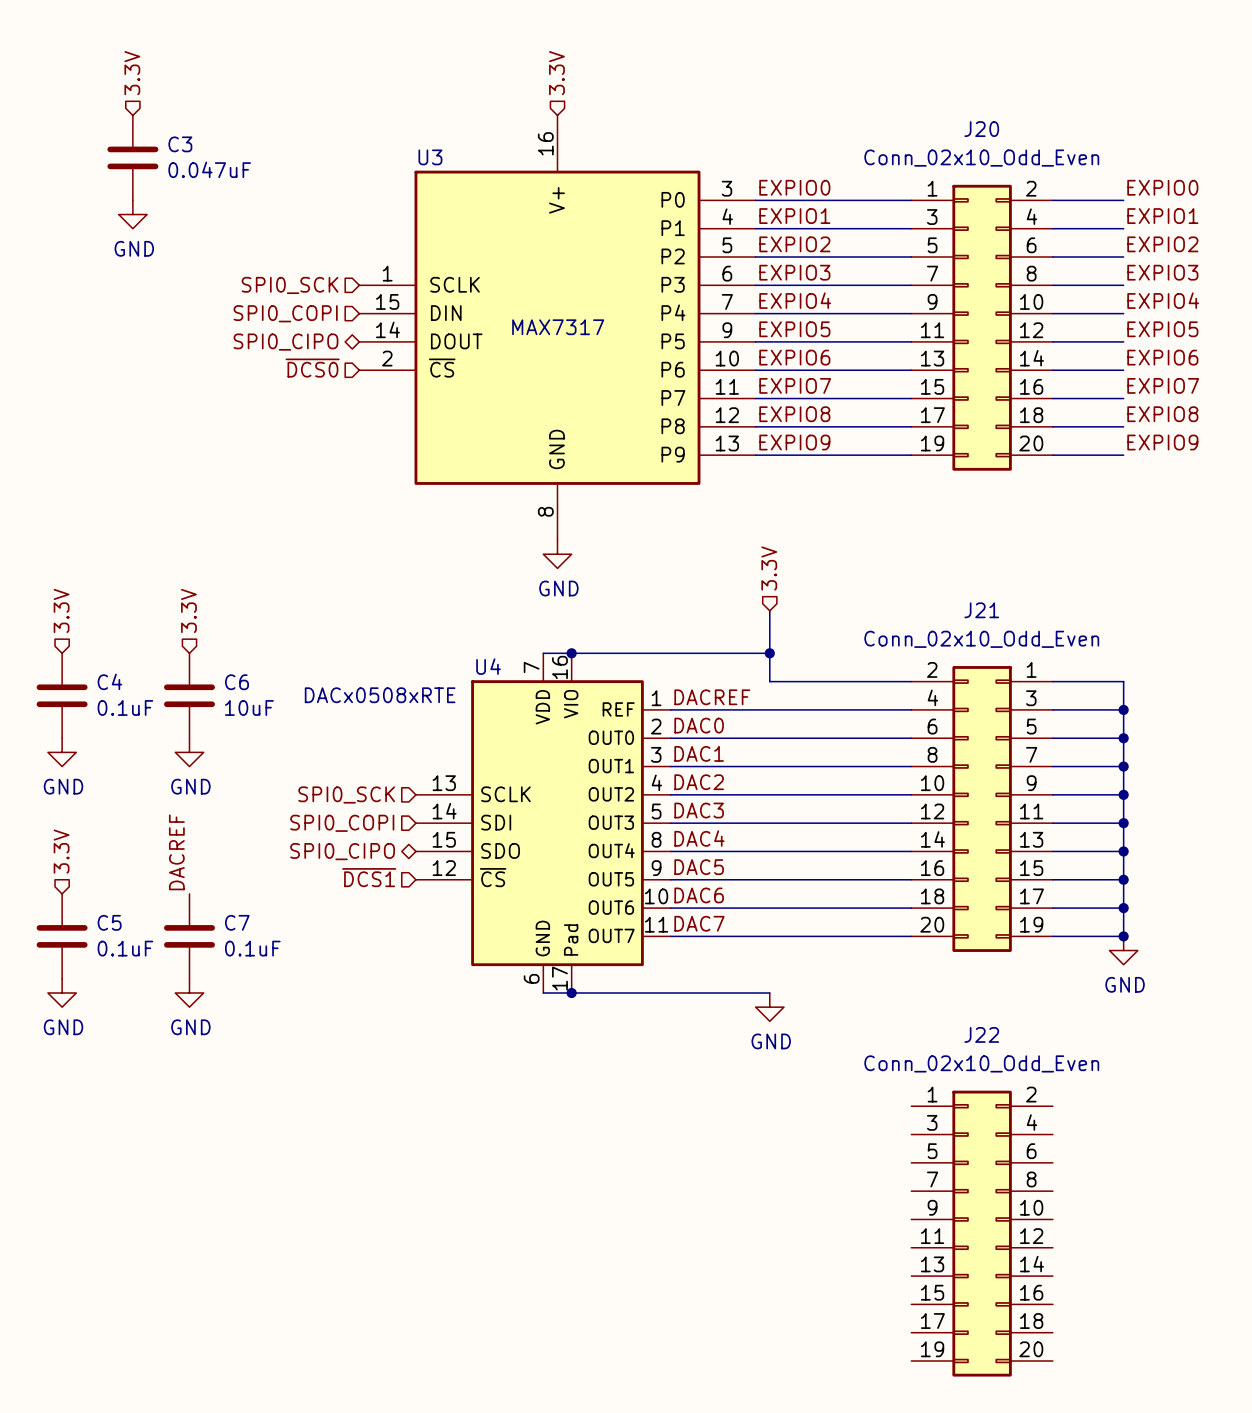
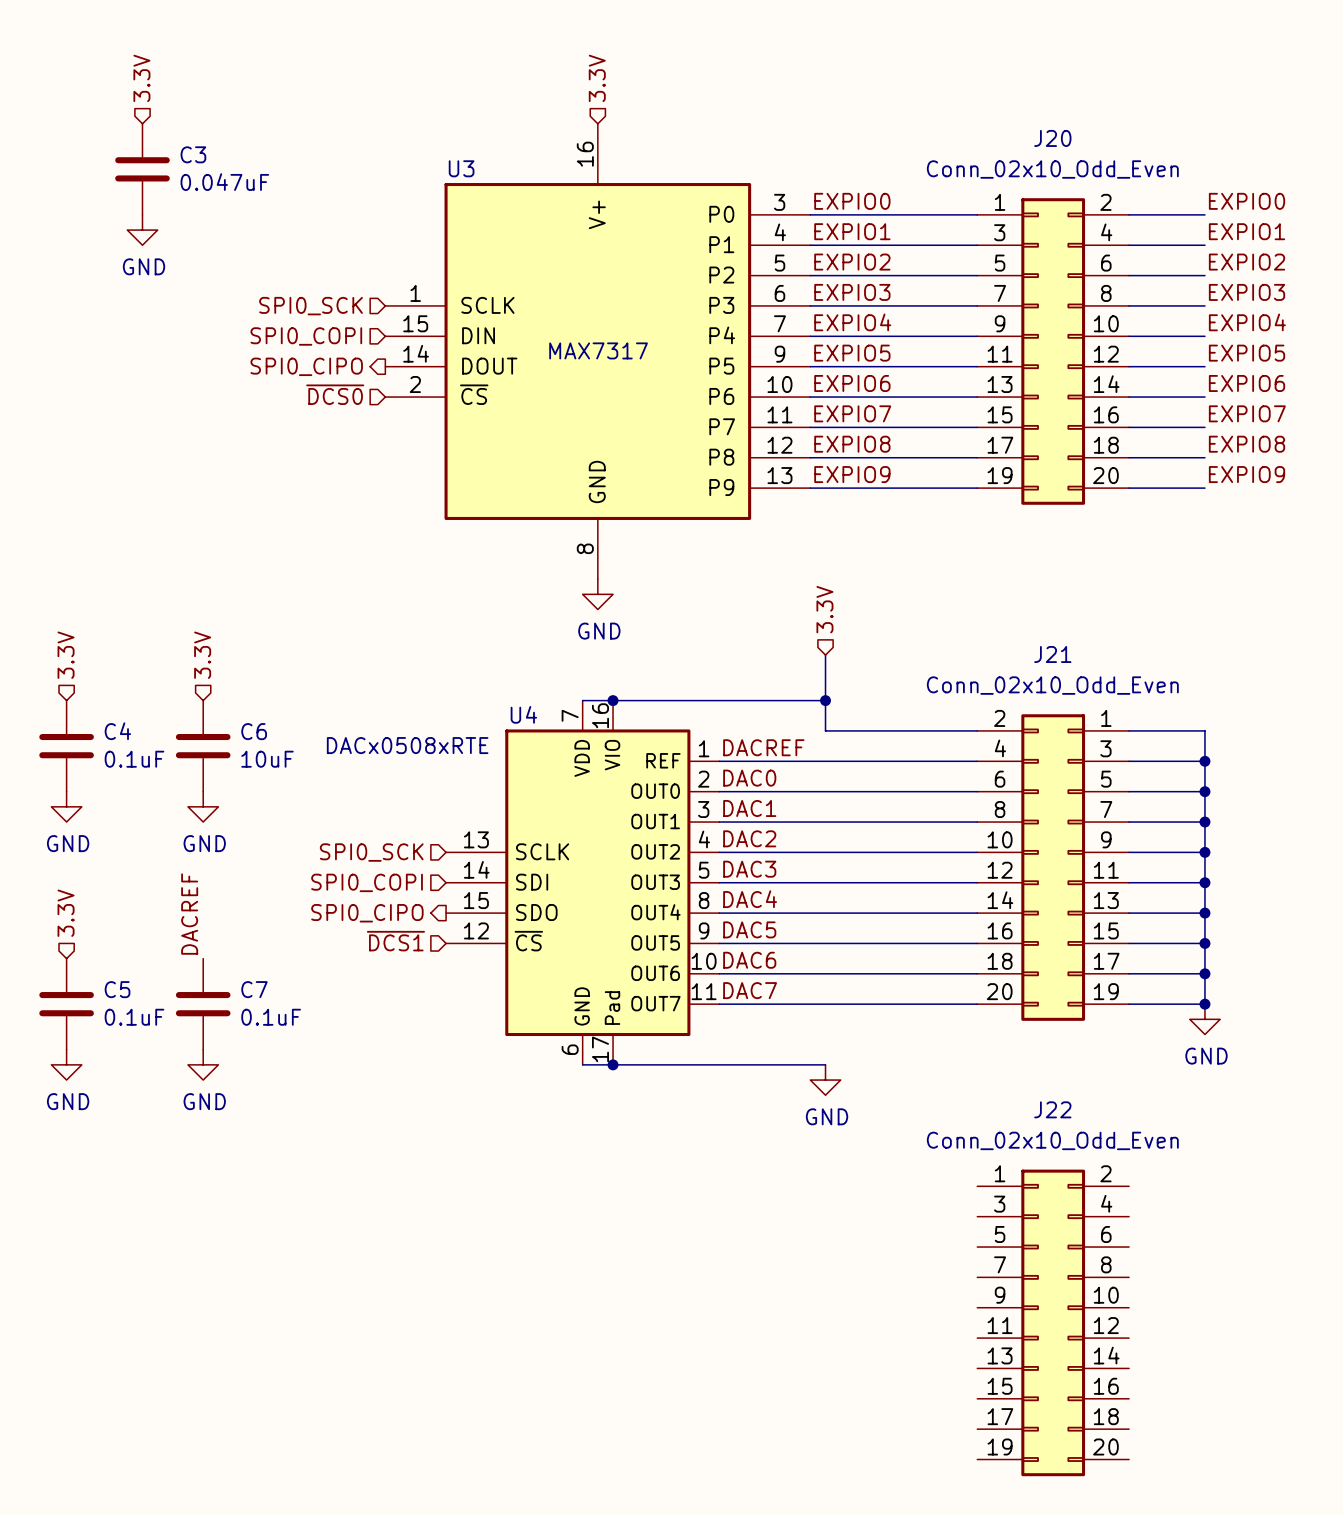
hierarchical label shape: bidirectional (285, 342) -> output (306, 366)
hierarchical label shape: bidirectional (342, 851) -> output (367, 913)

